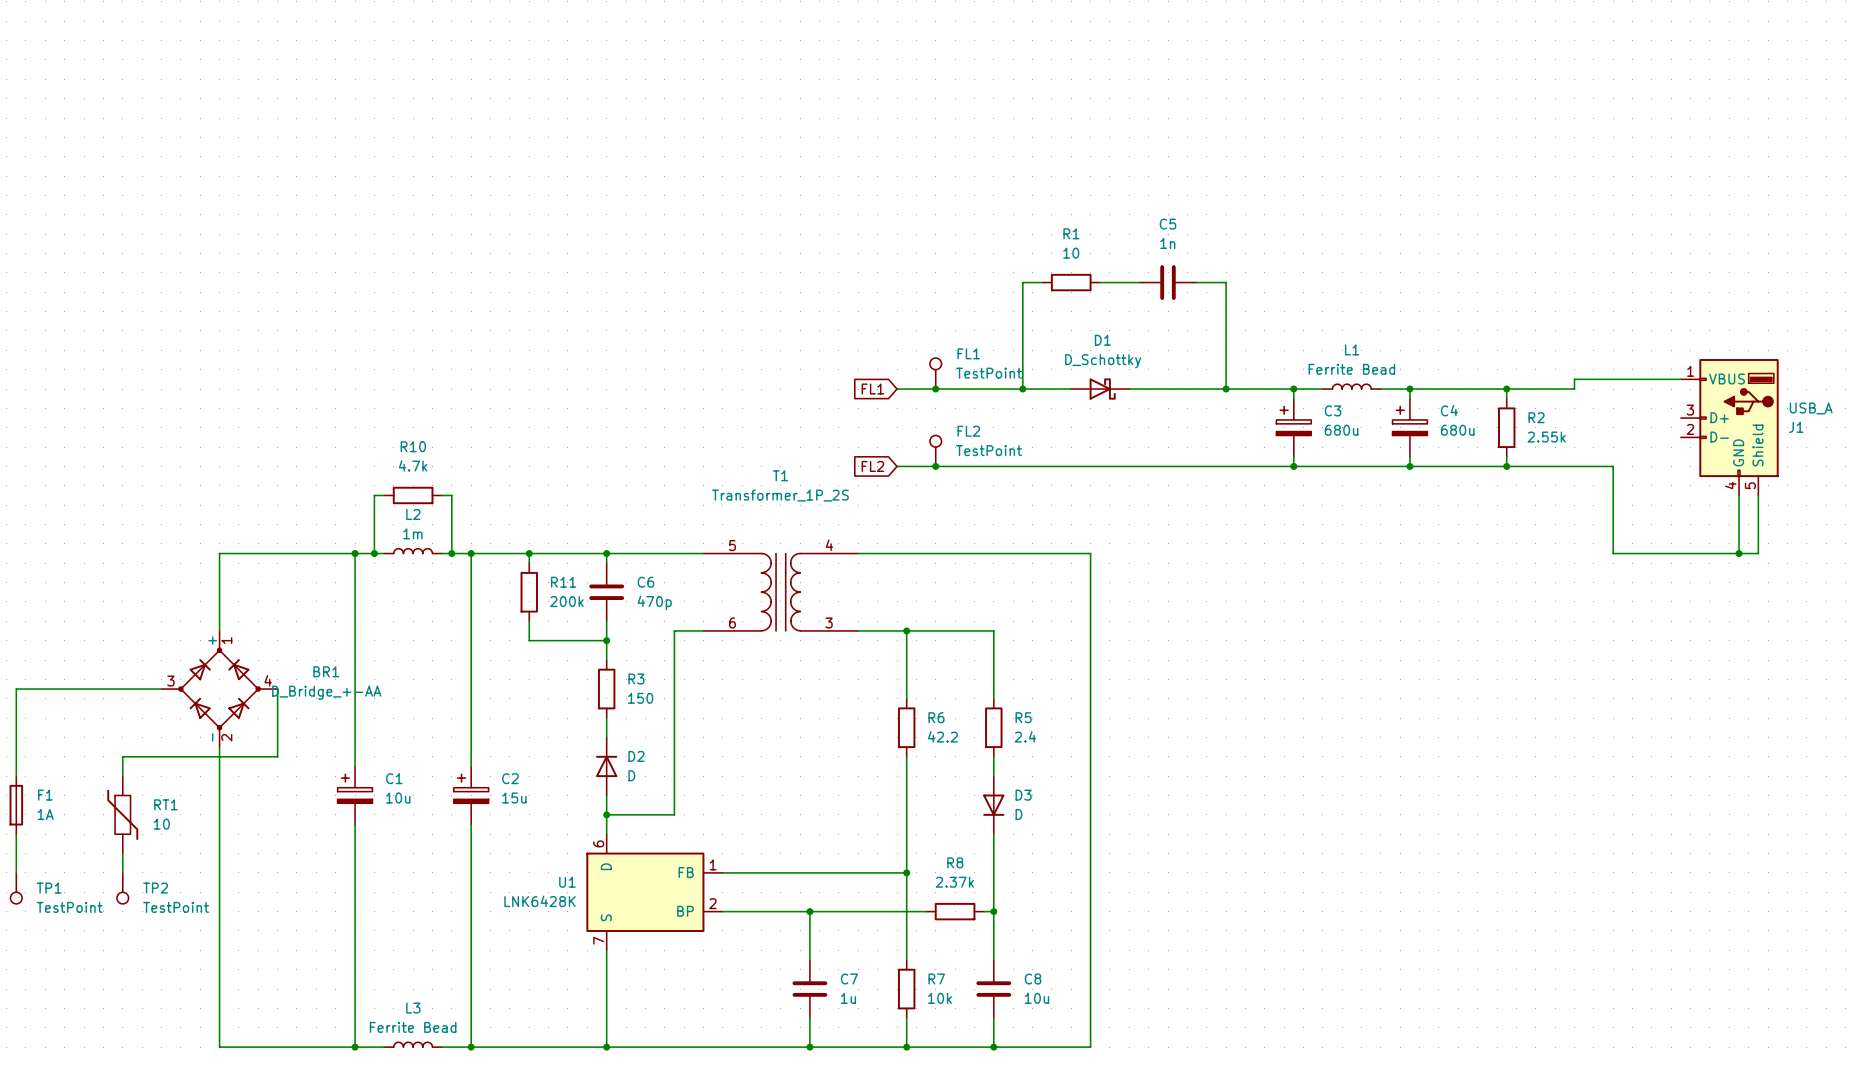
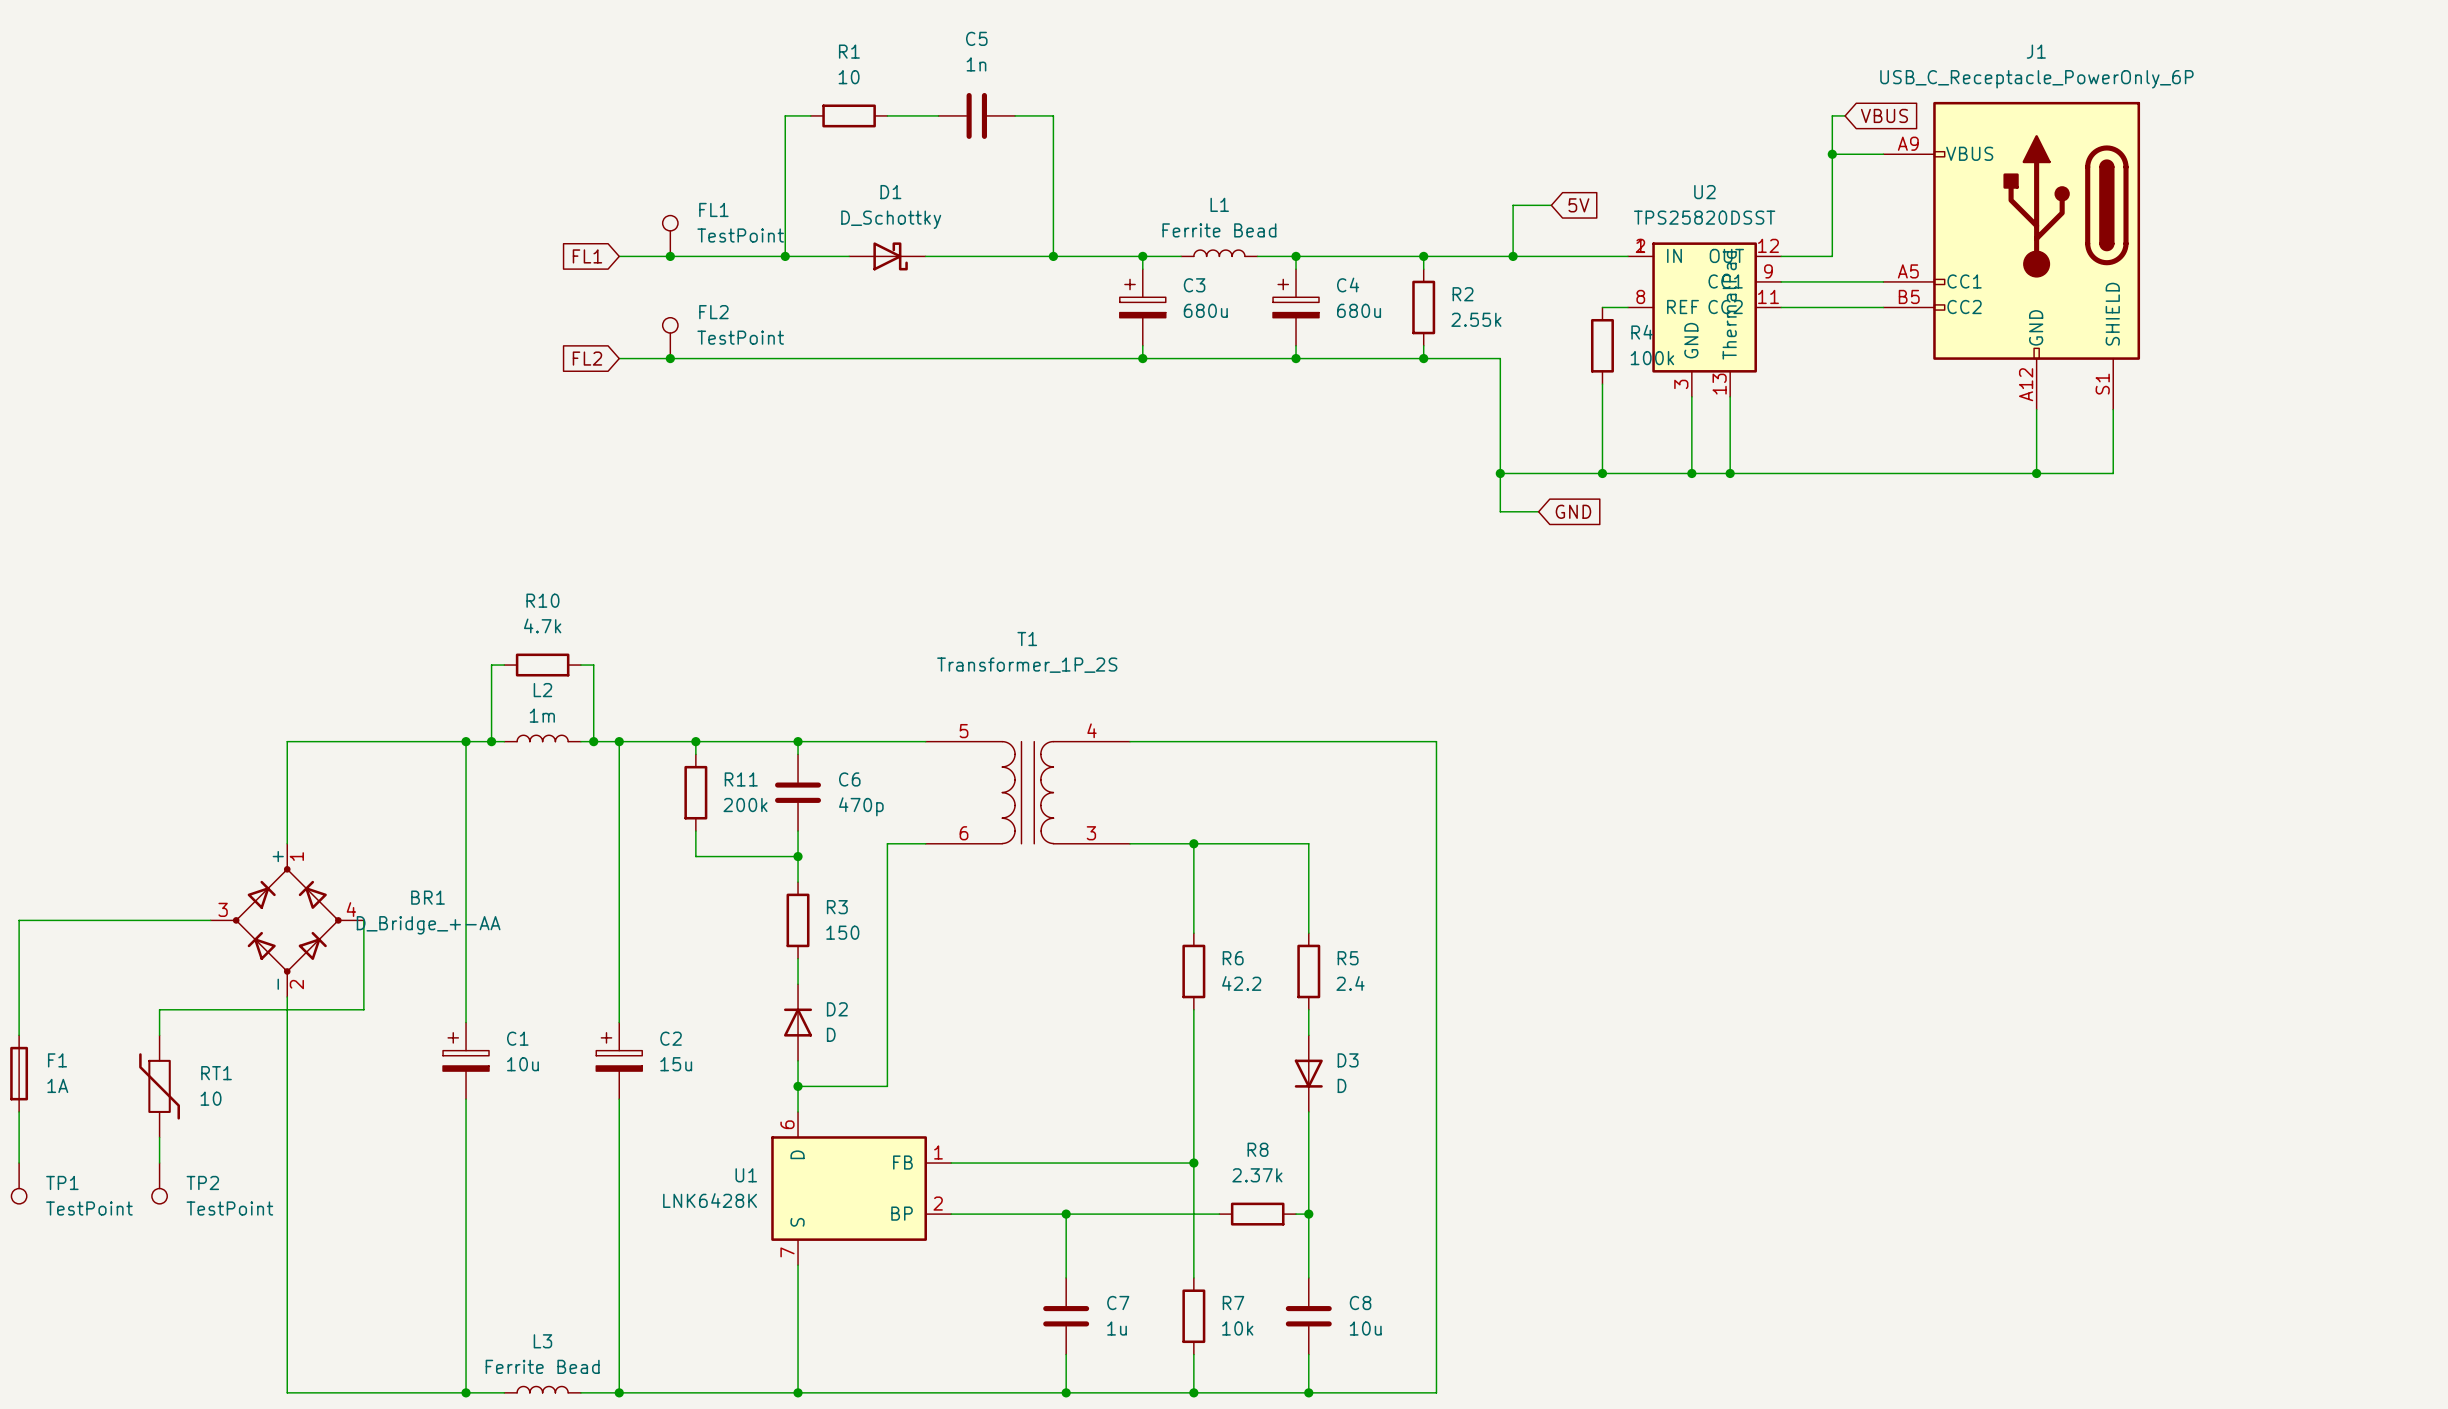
wire: none -> (810, 115) (785, 115) (785, 256)
wire: none -> (887, 115) (938, 115)
wire: none -> (1015, 115) (1053, 115) (1053, 256)
wire: none -> (1845, 115) (1832, 115) (1832, 256) (1781, 256)
global label: none -> VBUS (1884, 115)
wire: none -> (1832, 154) (1883, 154)
junction: none -> (1832, 154)
wire: none -> (1551, 205) (1513, 205) (1513, 256)
global label: none -> 5V (1578, 205)
global label: none -> FL1 (587, 256)
wire: none -> (619, 256) (849, 256)
junction: none -> (670, 256)
junction: none -> (785, 256)
wire: none -> (925, 256) (1181, 256)
junction: none -> (1053, 256)
wire: none -> (1142, 256) (1142, 269)
junction: none -> (1142, 256)
wire: none -> (1257, 256) (1628, 256)
wire: none -> (1296, 256) (1296, 269)
junction: none -> (1296, 256)
wire: none -> (1423, 256) (1423, 269)
junction: none -> (1423, 256)
junction: none -> (1513, 256)
wire: none -> (1781, 281) (1883, 281)
wire: none -> (1602, 307) (1628, 307)
wire: none -> (1781, 307) (1883, 307)
U2: none -> TPS25820DSST (1704, 319)
wire: none -> (1142, 345) (1142, 358)
wire: none -> (1296, 345) (1296, 358)
wire: none -> (1423, 345) (1423, 358)
R4: none -> 100k (1602, 345)
global label: none -> FL2 (587, 358)
wire: none -> (619, 358) (1500, 358) (1500, 511) (1538, 511)
junction: none -> (670, 358)
junction: none -> (1142, 358)
junction: none -> (1296, 358)
junction: none -> (1423, 358)
wire: (1042, 282) (1022, 282) (1022, 389) -> none
R1 position: (1071, 282) -> (849, 115)
wire: (1100, 282) (1138, 282) -> none
C5 position: (1168, 282) -> (976, 115)
wire: (1197, 282) (1226, 282) (1226, 389) -> none
wire: none -> (1602, 384) (1602, 473)
wire: none -> (1691, 396) (1691, 473)
wire: none -> (1730, 396) (1730, 473)
wire: none -> (2036, 409) (2036, 473)
wire: none -> (2113, 409) (2113, 473) (1500, 473)
junction: none -> (1500, 473)
junction: none -> (1602, 473)
junction: none -> (1691, 473)
junction: none -> (1730, 473)
junction: none -> (2036, 473)
J1 symbol: [1680, 359, 1779, 496] -> [1883, 101, 2141, 410]
FL1 position: (935, 373) -> (670, 235)
global label: none -> GND (1573, 511)
wire: (1680, 379) (1574, 379) (1574, 389) (1380, 389) -> none
L1 position: (1351, 386) -> (1219, 253)
global label: FL1 (872, 389) -> none
wire: (897, 389) (1071, 389) -> none
junction: (935, 389) -> none
junction: (1022, 389) -> none
D1 position: (1100, 389) -> (887, 256)
wire: (1129, 389) (1322, 389) -> none
junction: (1226, 389) -> none
wire: (1293, 389) (1293, 398) -> none
junction: (1293, 389) -> none
wire: (1409, 389) (1409, 398) -> none
junction: (1409, 389) -> none
wire: (1506, 389) (1506, 398) -> none
junction: (1506, 389) -> none
J1 value: USB_A (1811, 408) -> USB_C_Receptacle_PowerOnly_6P (2036, 79)
C3 position: (1293, 427) -> (1142, 307)
C4 position: (1409, 427) -> (1296, 307)
R2 position: (1506, 427) -> (1423, 307)
J1 name position: J1 (1796, 427) -> J1 (2036, 51)
FL2 position: (935, 450) -> (670, 338)
wire: (1293, 456) (1293, 466) -> none
wire: (1409, 456) (1409, 466) -> none
wire: (1506, 456) (1506, 466) -> none
global label: FL2 (872, 466) -> none
wire: (897, 466) (1613, 466) (1613, 553) (1758, 553) (1758, 495) -> none
junction: (935, 466) -> none
junction: (1293, 466) -> none
junction: (1409, 466) -> none
junction: (1506, 466) -> none
wire: (1739, 495) (1739, 553) -> none
junction: (1739, 553) -> none

